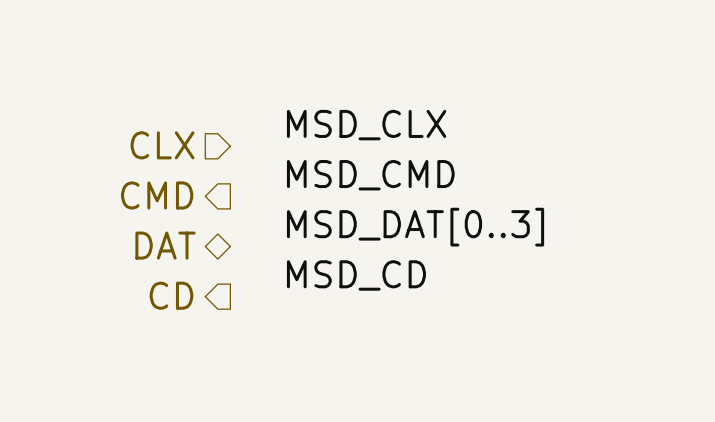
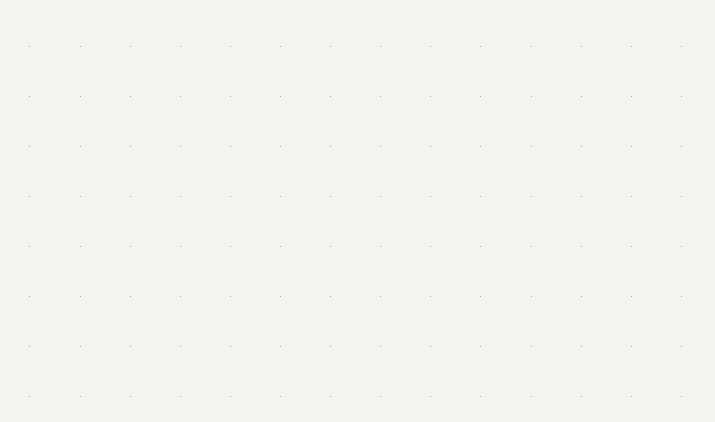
label: MSD_CLX (366, 125) -> none
hierarchical label: CLX (162, 145) -> none
label: MSD_CMD (370, 175) -> none
hierarchical label: CMD (157, 195) -> none
label: MSD_DAT[0..3] (415, 227) -> none
hierarchical label: DAT (165, 245) -> none
label: MSD_CD (356, 275) -> none
hierarchical label: CD (171, 295) -> none

